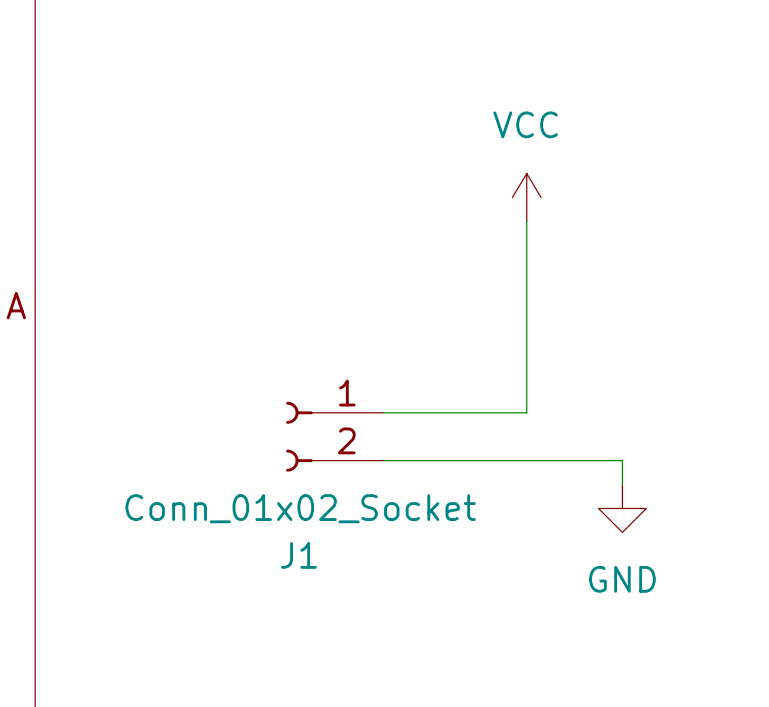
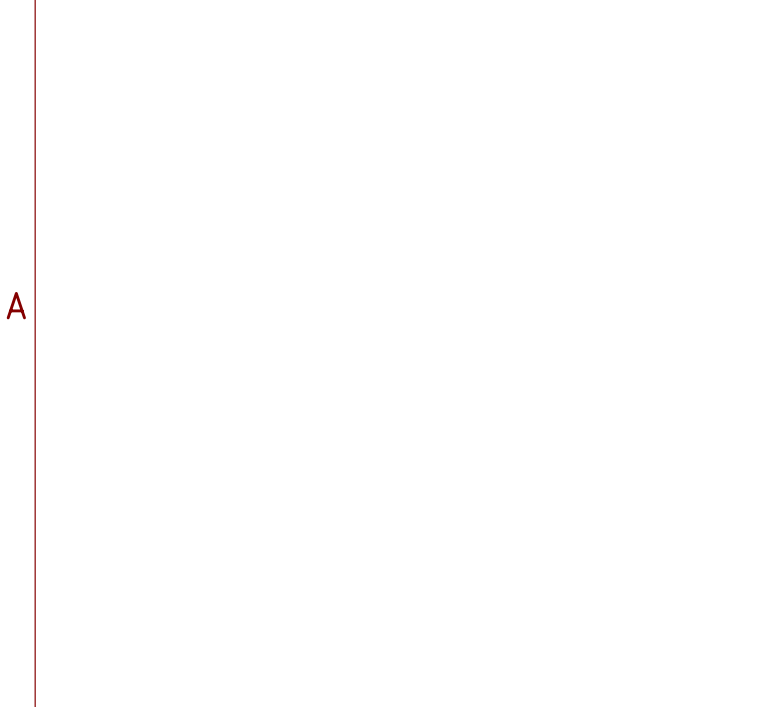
power symbol: VCC (526, 197) -> none
wire: (526, 221) (526, 412) (383, 412) -> none
J1: Conn_01x02_Socket (334, 436) -> none
wire: (383, 460) (622, 460) (622, 484) -> none
power symbol: GND (622, 508) -> none

